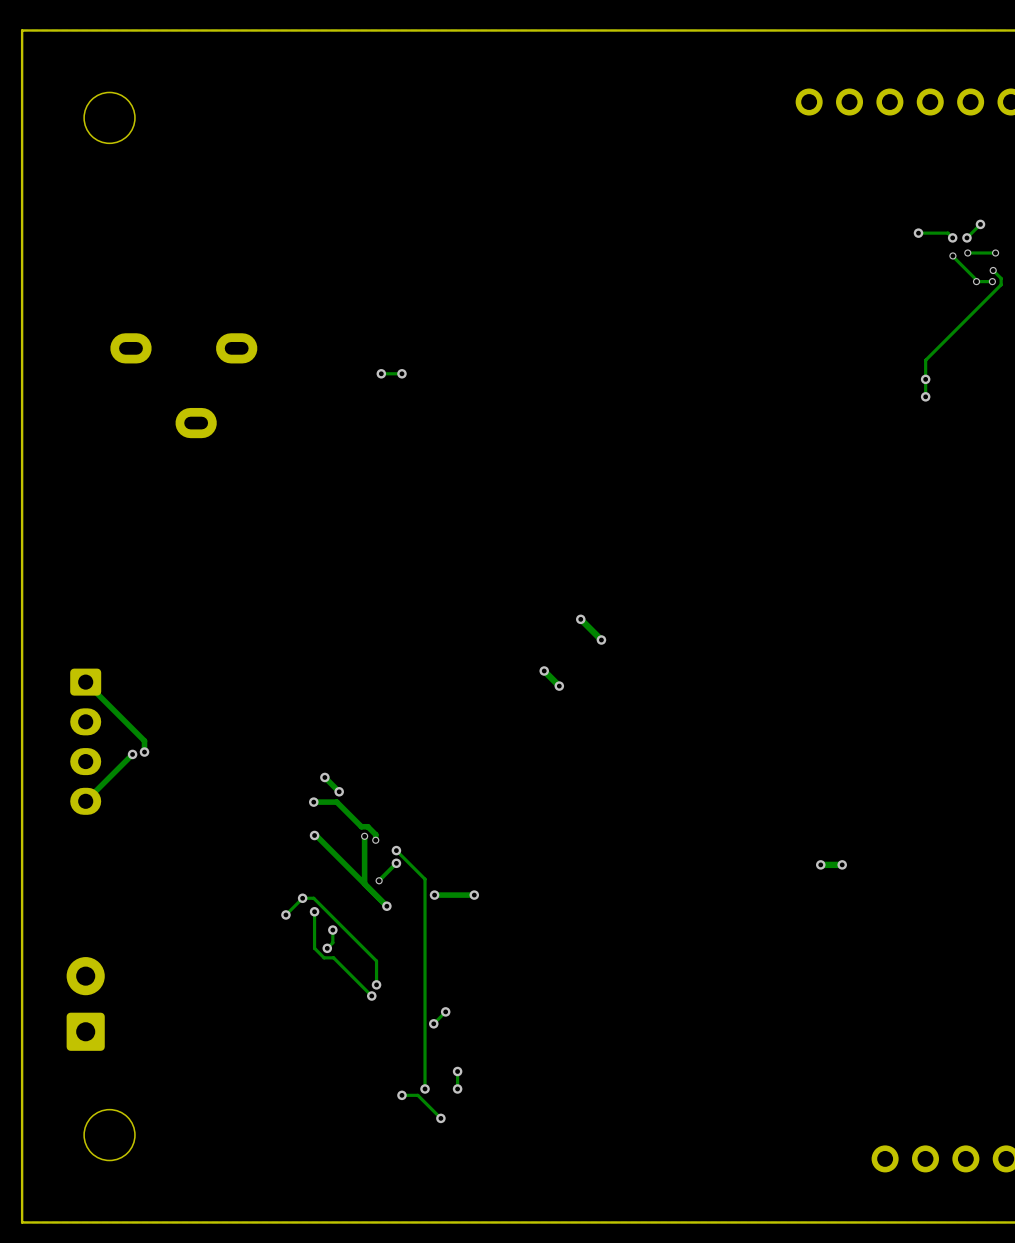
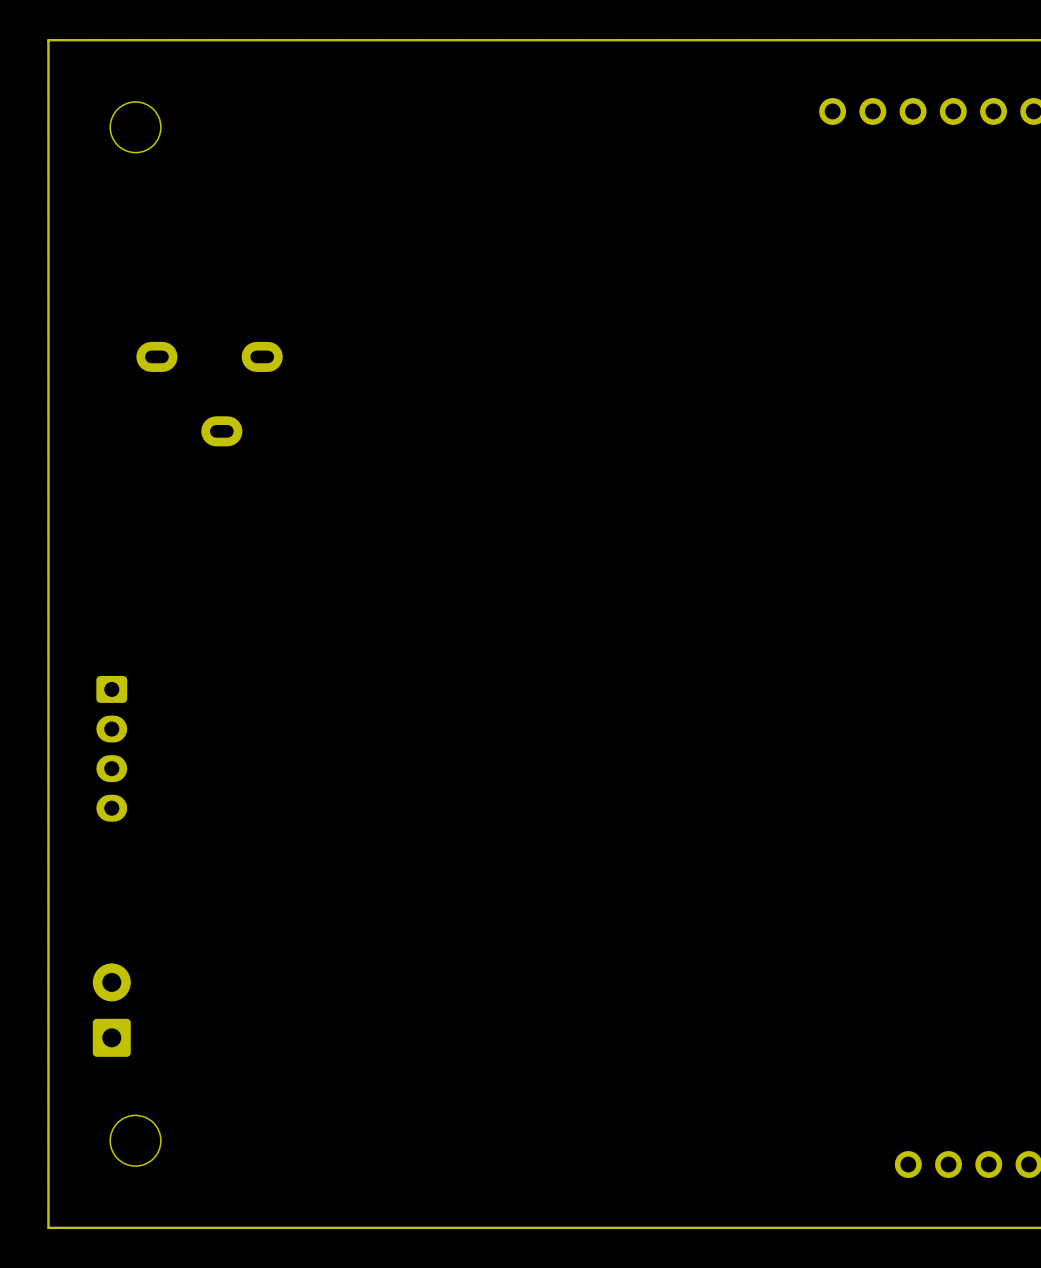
track: (980, 224) (966, 237) -> none
via: (980, 224) -> none
track: (918, 233) (947, 233) (952, 237) -> none
via: (918, 233) -> none
via: (952, 237) -> none
via: (966, 237) -> none
via: (967, 253) -> none
track: (995, 253) (967, 253) -> none
via: (995, 253) -> none
via: (952, 255) -> none
track: (952, 256) (976, 280) -> none
track: (993, 270) (1001, 278) (1001, 284) (925, 360) (925, 396) -> none
via: (993, 270) -> none
via: (976, 281) -> none
track: (992, 281) (976, 281) -> none
via: (992, 281) -> none
via: (381, 373) -> none
track: (401, 373) (381, 373) -> none
via: (401, 373) -> none
via: (925, 379) -> none
via: (925, 396) -> none
track: (580, 619) (601, 640) -> none
via: (580, 619) -> none
via: (601, 640) -> none
track: (544, 670) (559, 686) -> none
via: (544, 670) -> none
track: (85, 682) (144, 740) (144, 752) -> none
via: (559, 686) -> none
via: (144, 752) -> none
track: (132, 754) (85, 801) -> none
via: (132, 754) -> none
track: (324, 777) (339, 791) -> none
via: (324, 777) -> none
via: (339, 791) -> none
track: (313, 802) (336, 802) (361, 826) (367, 826) (375, 834) (375, 840) -> none
via: (313, 802) -> none
track: (314, 835) (386, 906) -> none
via: (314, 835) -> none
track: (364, 836) (364, 883) -> none
via: (364, 836) -> none
via: (375, 840) -> none
track: (396, 850) (425, 879) (425, 1088) -> none
via: (396, 850) -> none
track: (396, 863) (378, 880) -> none
via: (396, 863) -> none
via: (820, 864) -> none
track: (842, 864) (820, 864) -> none
via: (842, 864) -> none
via: (379, 880) -> none
via: (434, 895) -> none
track: (474, 895) (434, 895) -> none
via: (474, 895) -> none
via: (302, 898) -> none
via: (386, 906) -> none
track: (314, 911) (314, 948) (324, 957) (333, 957) (371, 996) -> none
via: (314, 911) -> none
track: (285, 914) (302, 898) (313, 898) (376, 961) (376, 984) -> none
via: (285, 914) -> none
track: (332, 930) (332, 942) (327, 948) -> none
via: (332, 930) -> none
via: (327, 948) -> none
via: (376, 984) -> none
via: (371, 996) -> none
track: (445, 1011) (433, 1023) -> none
via: (445, 1011) -> none
via: (433, 1023) -> none
track: (457, 1071) (457, 1088) -> none
via: (457, 1071) -> none
via: (425, 1088) -> none
via: (457, 1088) -> none
track: (401, 1095) (417, 1095) (440, 1118) -> none
via: (401, 1095) -> none
via: (440, 1118) -> none

